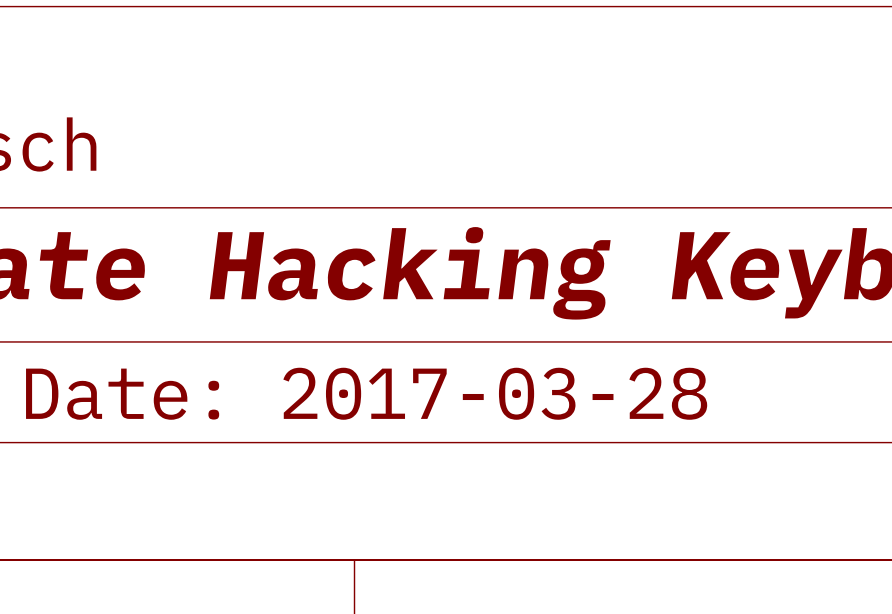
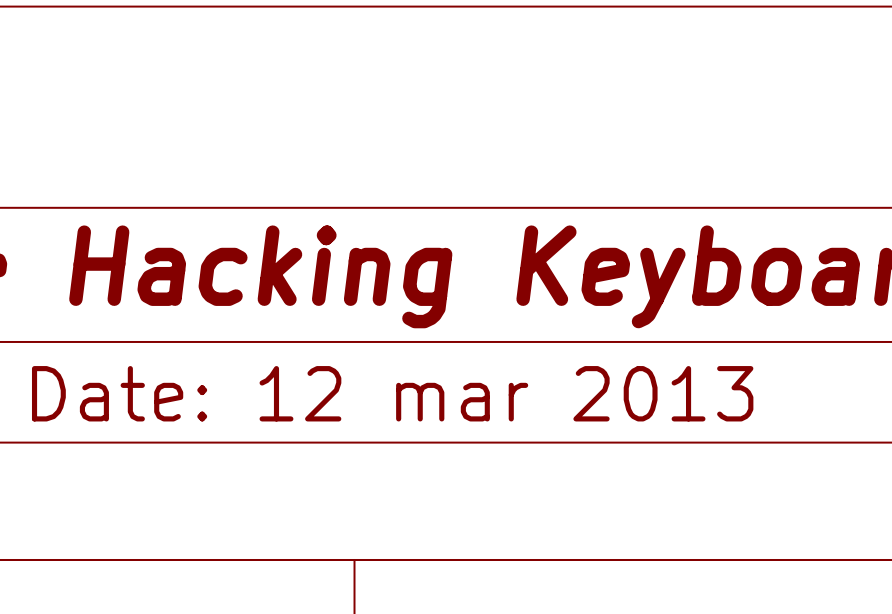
title block: Date: 2017-03-28 (366, 393) -> Date: 12 mar 2013 (392, 393)

